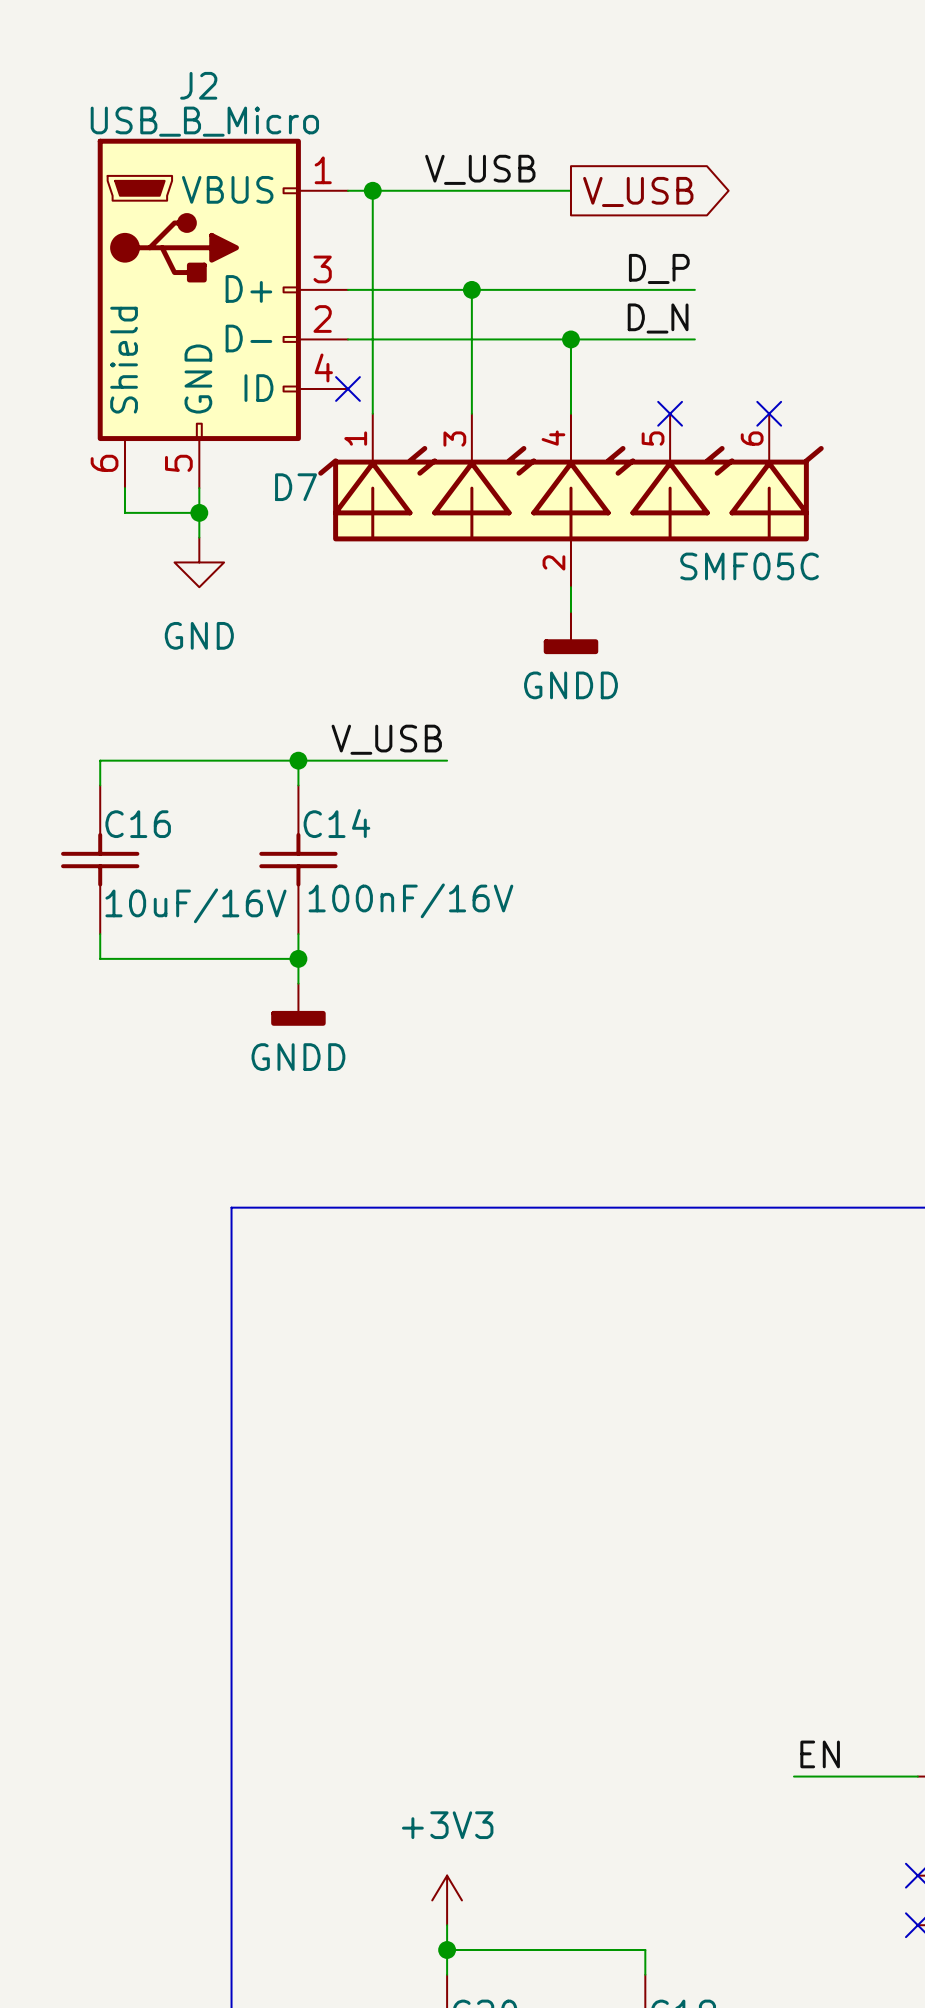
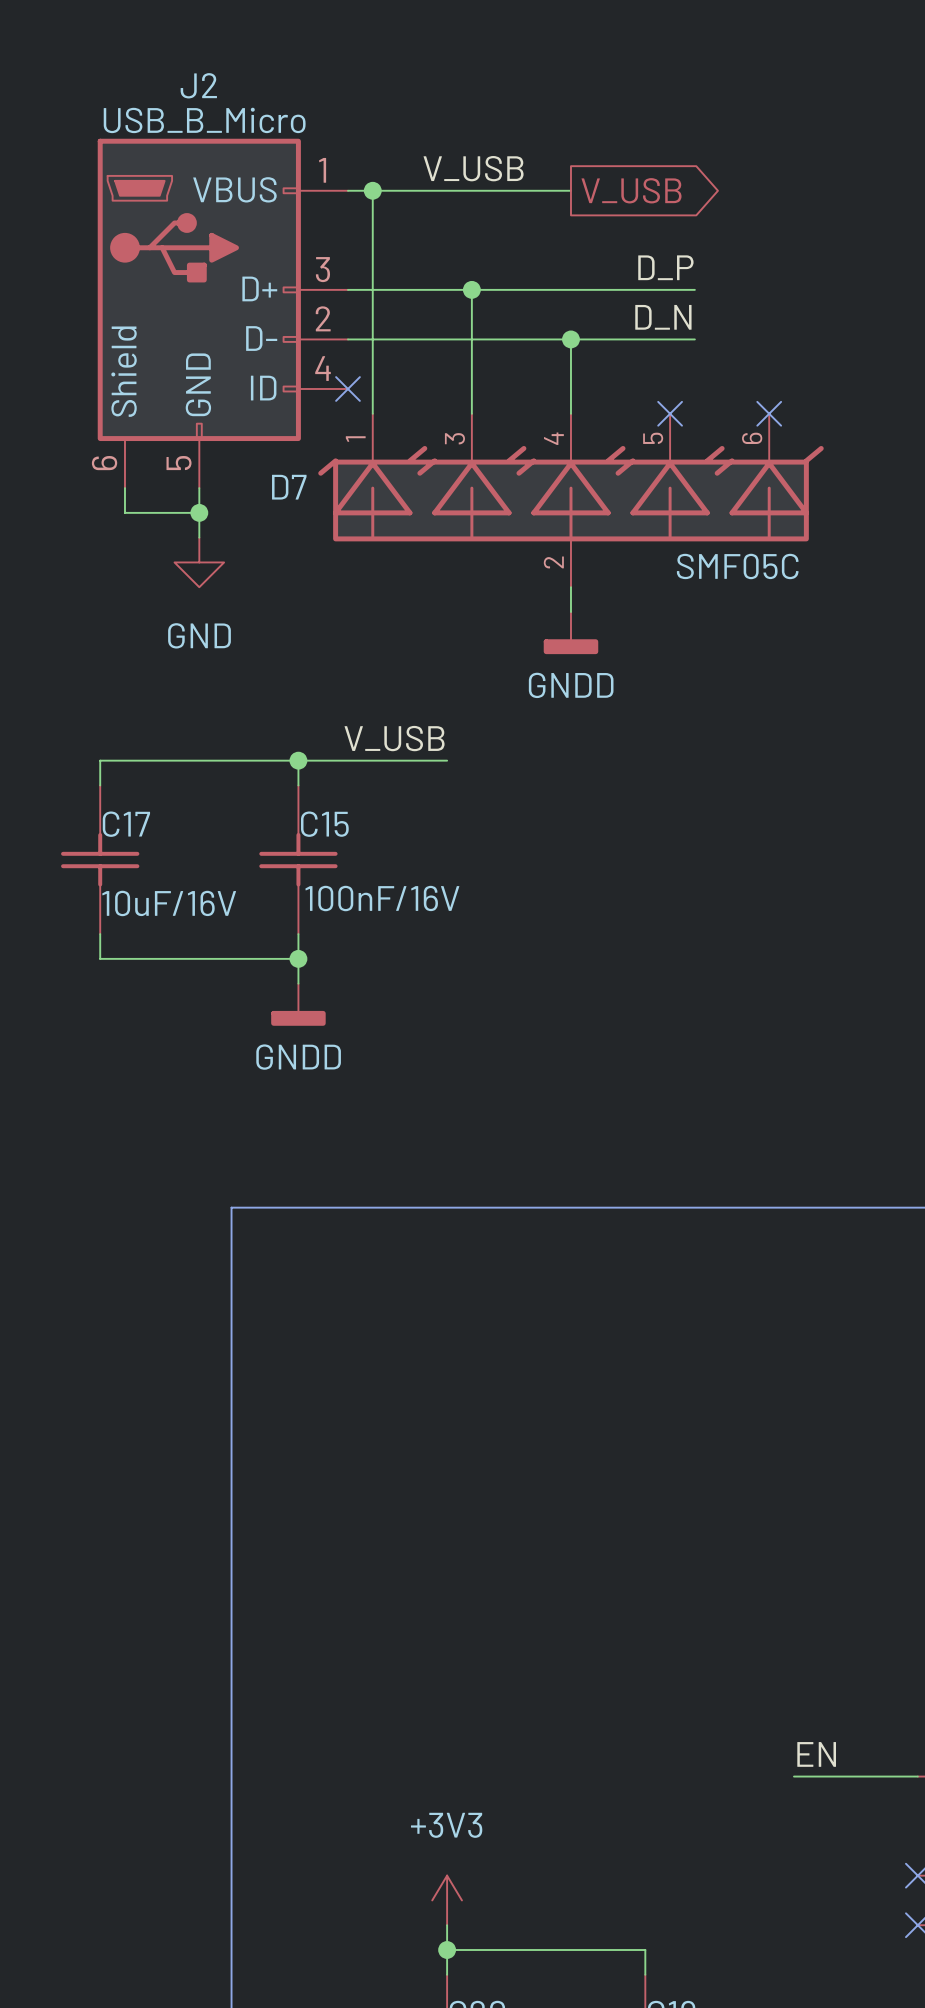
C14 name: C14 (336, 823) -> C15 (324, 824)
C16 name: C16 (138, 824) -> C17 (126, 824)

